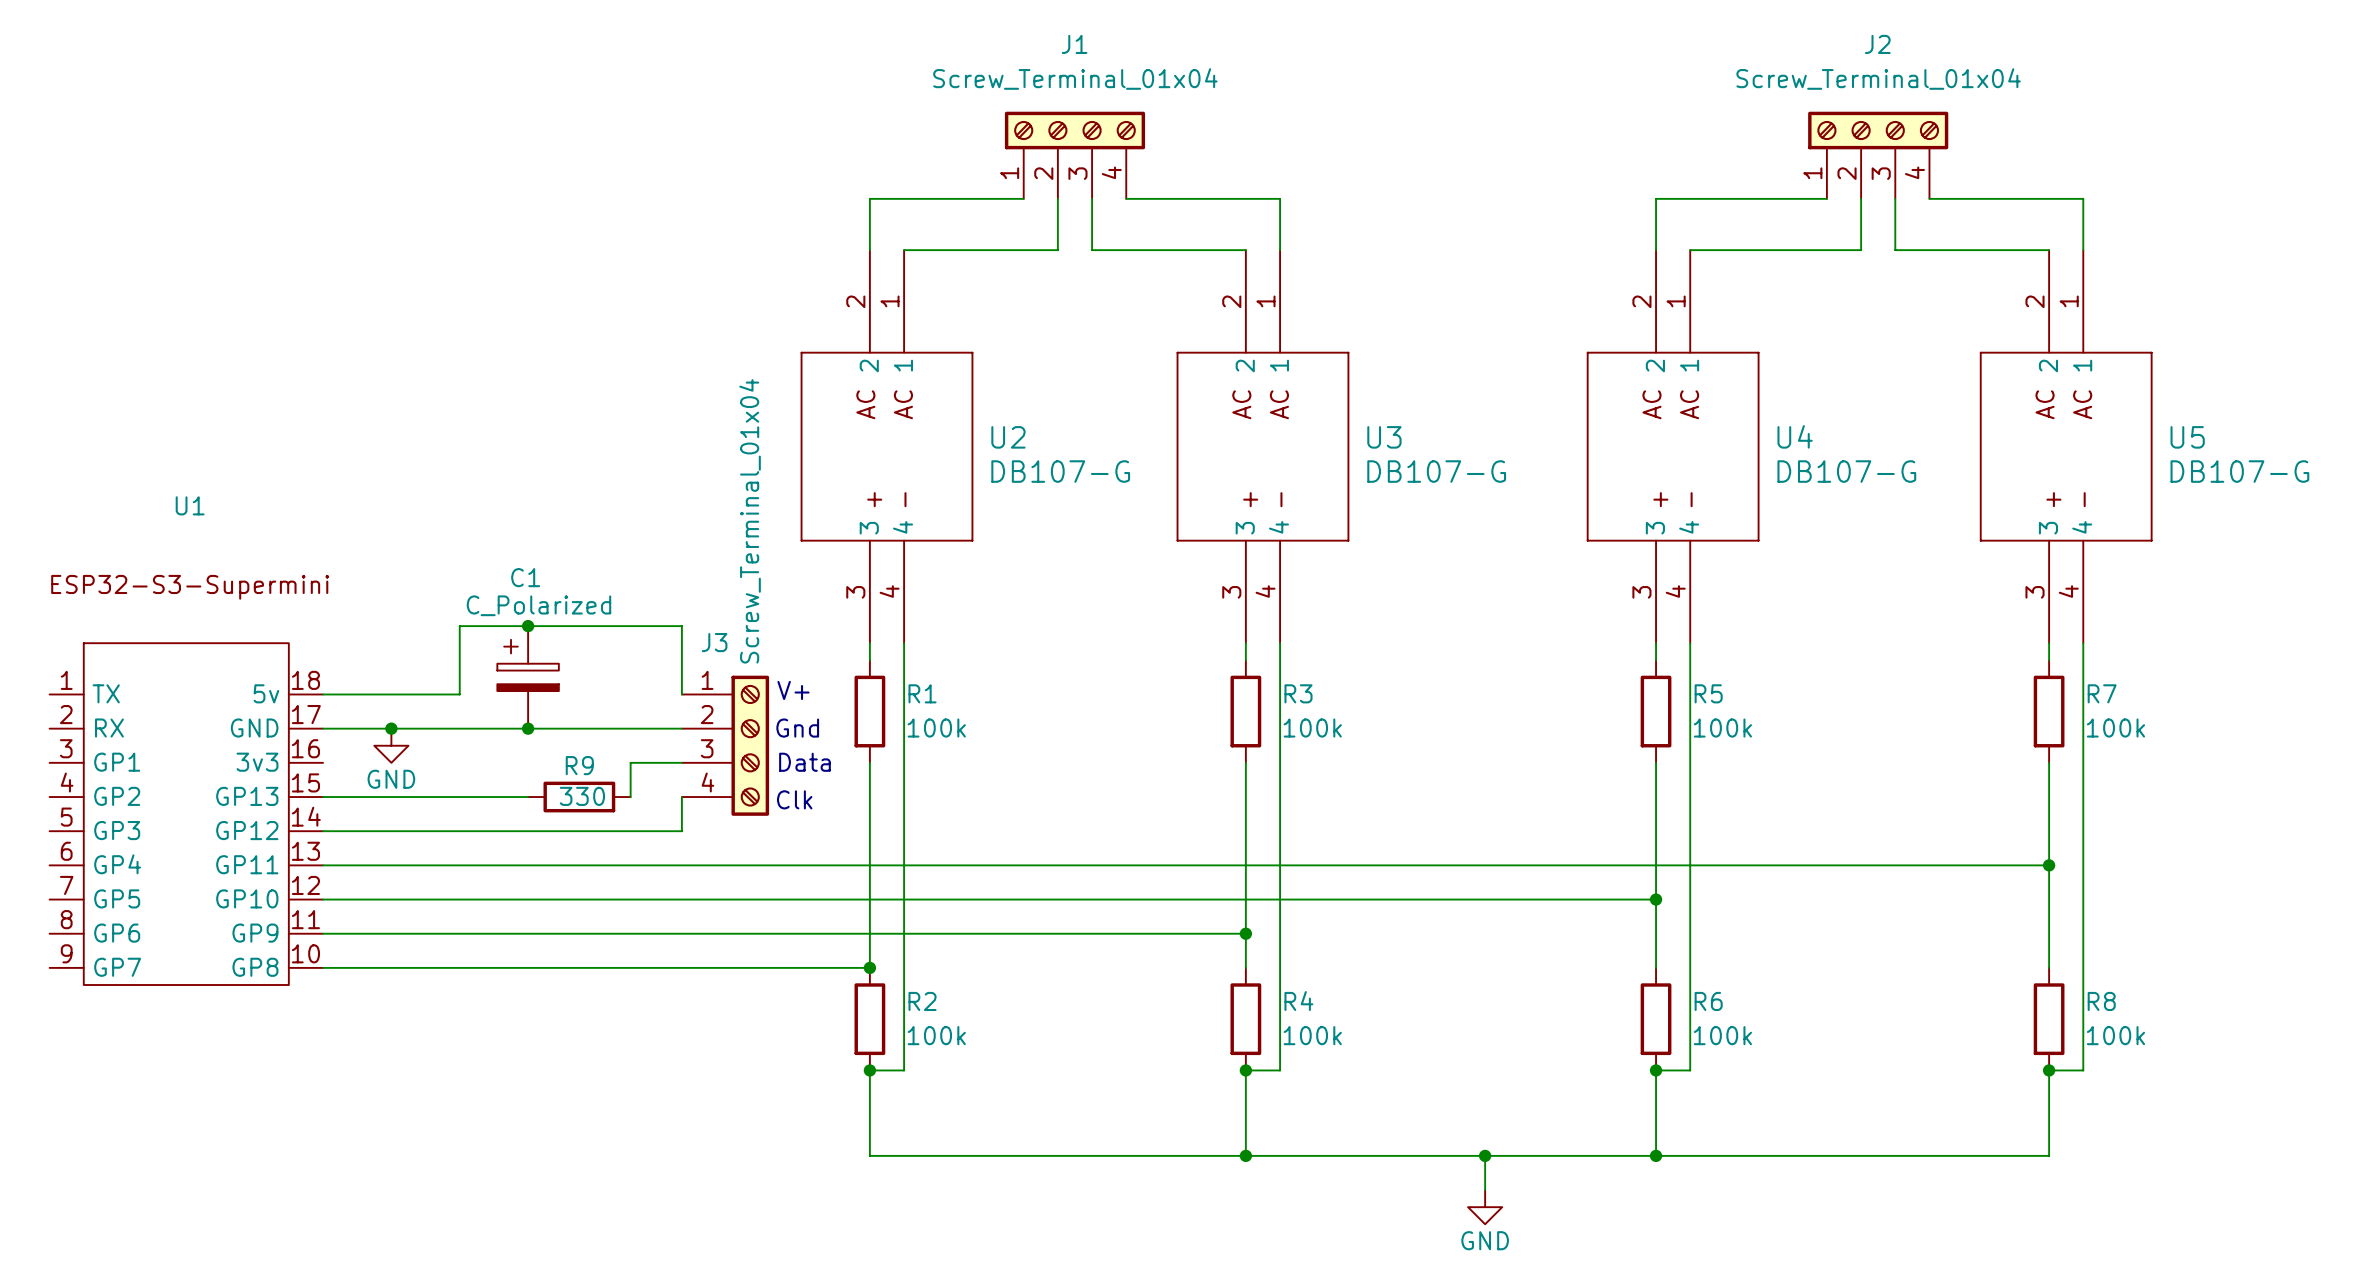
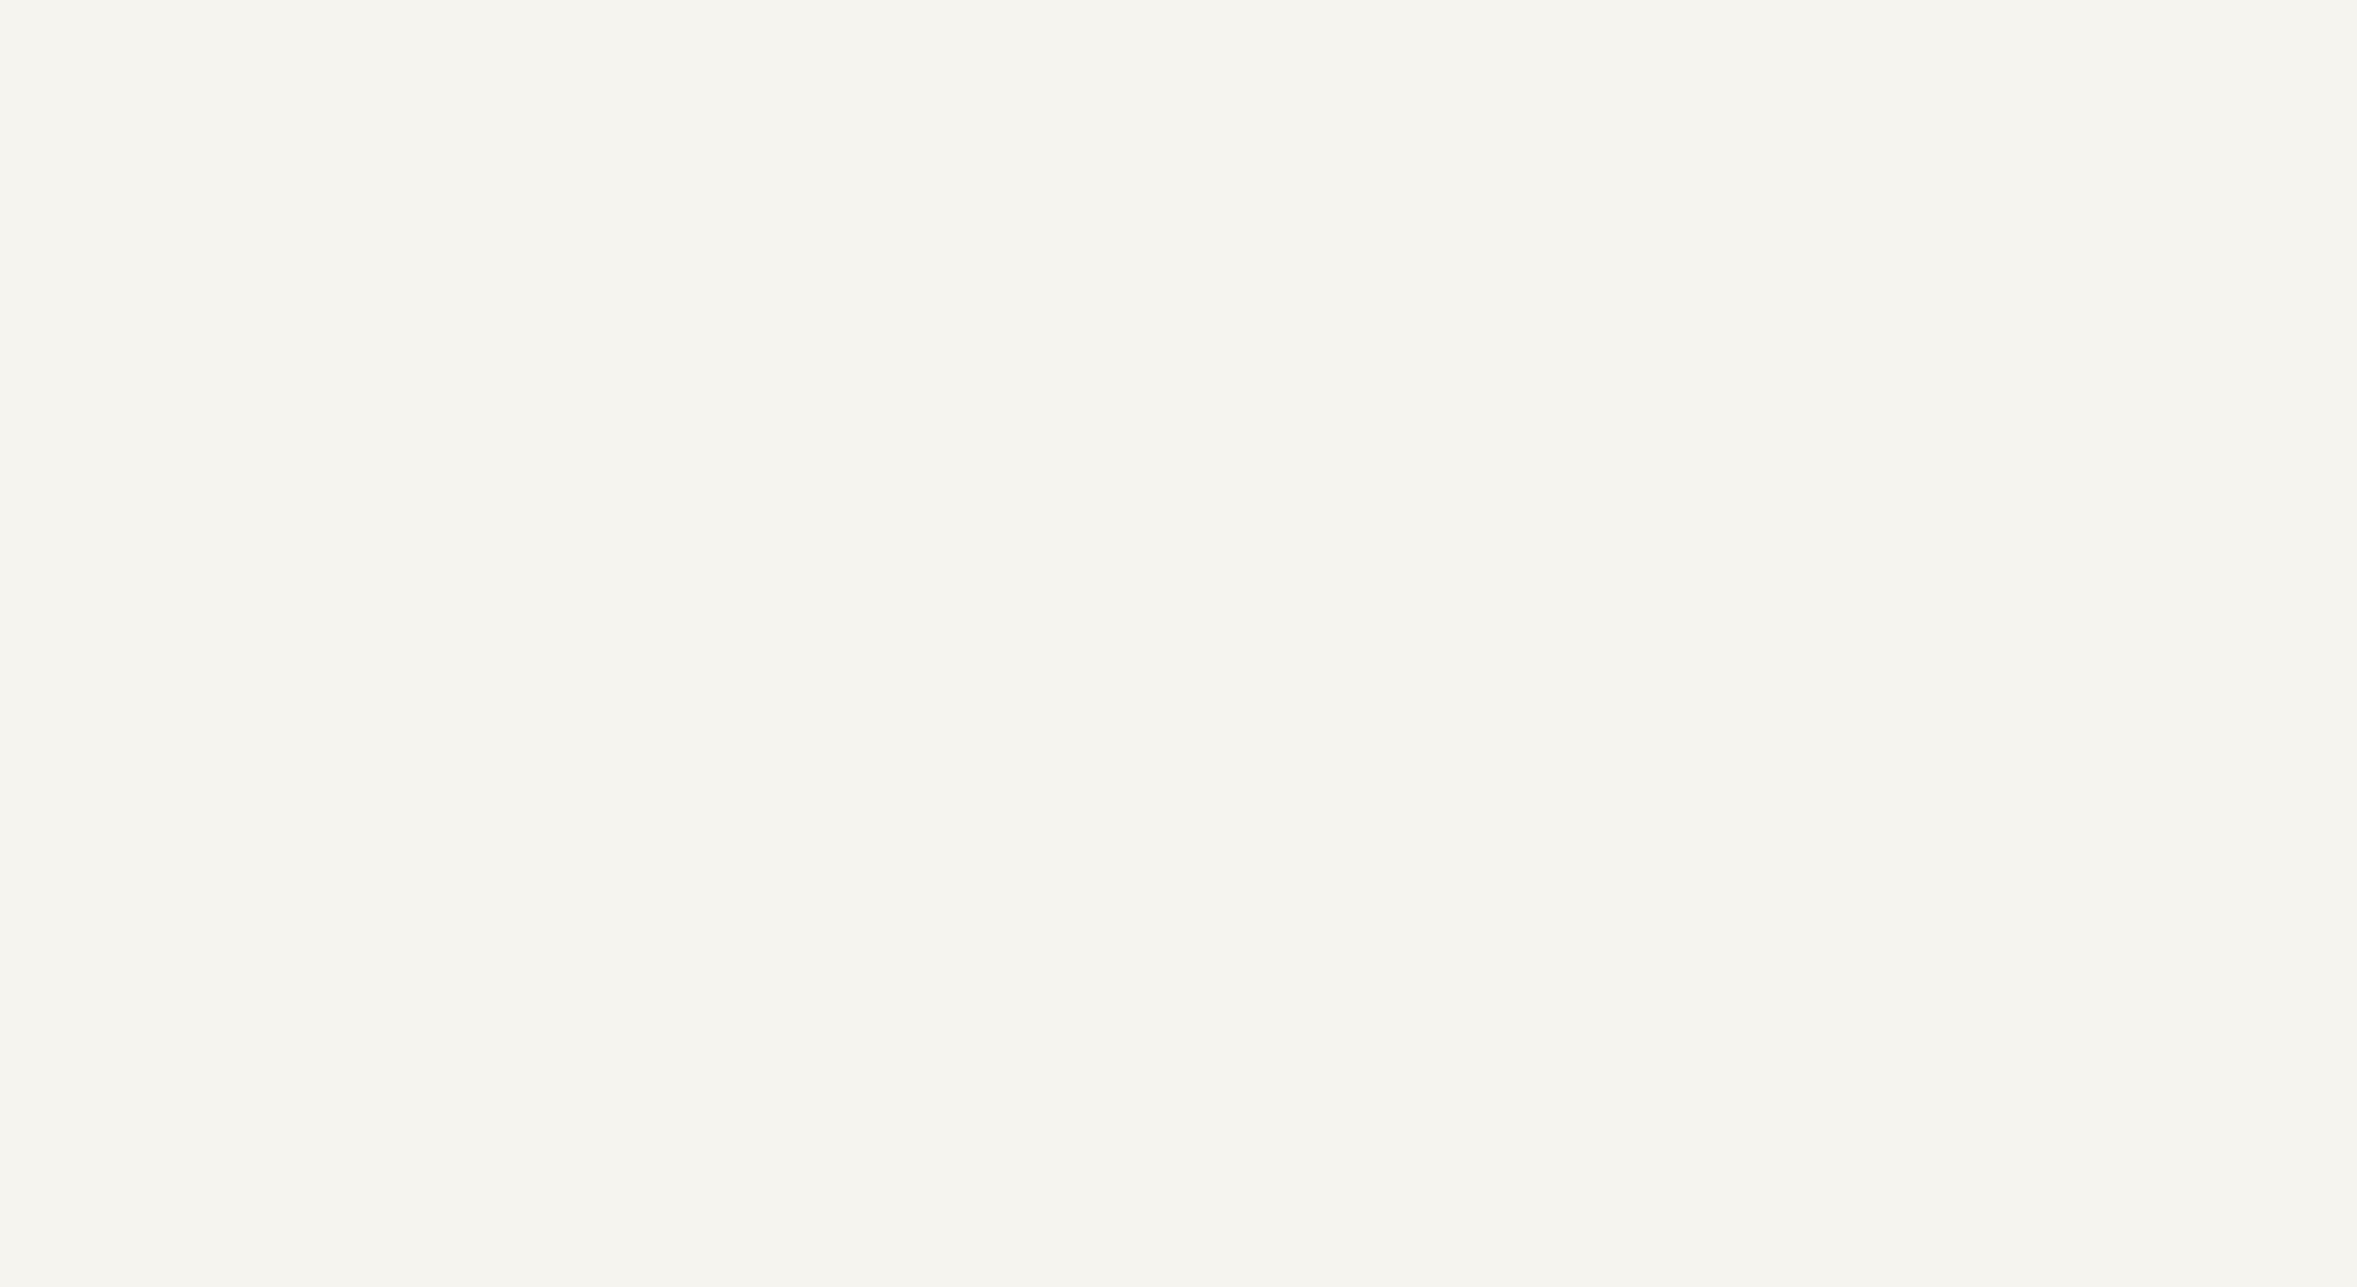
J1: Screw_Terminal_01x04 (1074, 155) -> none
J2: Screw_Terminal_01x04 (1878, 155) -> none
wire: (1023, 198) (869, 198) (869, 250) -> none
wire: (1057, 198) (1057, 250) (904, 250) -> none
wire: (1092, 198) (1092, 250) (1245, 250) -> none
wire: (1126, 198) (1280, 198) (1280, 250) -> none
wire: (1826, 198) (1656, 198) (1656, 250) -> none
wire: (1861, 198) (1861, 250) (1690, 250) -> none
wire: (1895, 198) (1895, 250) (2049, 250) -> none
wire: (1929, 198) (2083, 198) (2083, 250) -> none
U2: DB107-G (886, 446) -> none
U3: DB107-G (1262, 446) -> none
U4: DB107-G (1673, 446) -> none
U5: DB107-G (2066, 446) -> none
junction: (528, 626) -> none
wire: (869, 643) (869, 660) -> none
wire: (904, 643) (904, 1070) (869, 1070) (869, 1155) (2049, 1155) (2049, 1070) (2083, 1070) (2083, 643) -> none
wire: (1245, 643) (1245, 660) -> none
wire: (1280, 643) (1280, 1070) (1245, 1070) (1245, 1155) -> none
wire: (1656, 643) (1656, 660) -> none
wire: (1690, 643) (1690, 1070) (1656, 1070) (1656, 1155) -> none
wire: (2049, 643) (2049, 660) -> none
C1: C_Polarized (528, 677) -> none
text: V+ (793, 690) -> none
wire: (323, 694) (459, 694) (459, 626) (681, 626) (681, 694) -> none
R1: 100k (869, 711) -> none
R3: 100k (1245, 711) -> none
R5: 100k (1656, 711) -> none
R7: 100k (2049, 711) -> none
wire: (323, 728) (681, 728) -> none
junction: (391, 728) -> none
junction: (528, 728) -> none
text: Gnd (797, 728) -> none
power symbol: GND (391, 745) -> none
J3: Screw_Terminal_01x04 (725, 745) -> none
wire: (681, 762) (630, 762) (630, 797) -> none
text: Data (804, 762) -> none
wire: (869, 762) (869, 967) (323, 967) -> none
wire: (1245, 762) (1245, 967) -> none
wire: (1656, 762) (1656, 967) -> none
wire: (2049, 762) (2049, 967) -> none
wire: (323, 797) (528, 797) -> none
R9: 330 (579, 797) -> none
wire: (681, 797) (681, 831) (323, 831) -> none
text: Clk (794, 799) -> none
U1: (186, 814) -> none
wire: (323, 865) (2049, 865) -> none
junction: (2049, 865) -> none
wire: (323, 899) (1656, 899) -> none
junction: (1656, 899) -> none
wire: (323, 933) (1245, 933) -> none
junction: (1245, 933) -> none
junction: (869, 967) -> none
R2: 100k (869, 1019) -> none
R4: 100k (1245, 1019) -> none
R6: 100k (1656, 1019) -> none
R8: 100k (2049, 1019) -> none
junction: (869, 1070) -> none
junction: (1245, 1070) -> none
junction: (1656, 1070) -> none
junction: (2049, 1070) -> none
junction: (1245, 1155) -> none
wire: (1485, 1155) (1485, 1190) -> none
junction: (1485, 1155) -> none
junction: (1656, 1155) -> none
power symbol: GND (1485, 1207) -> none

